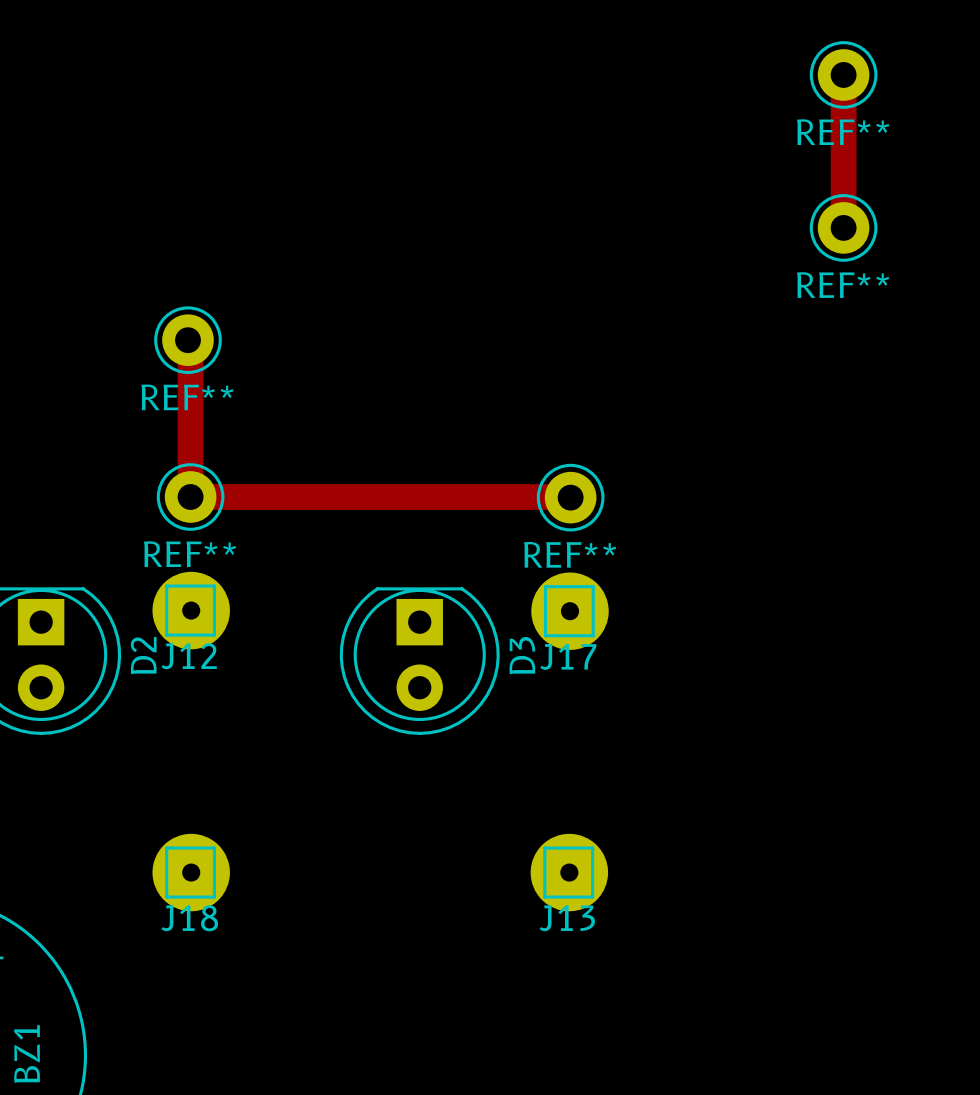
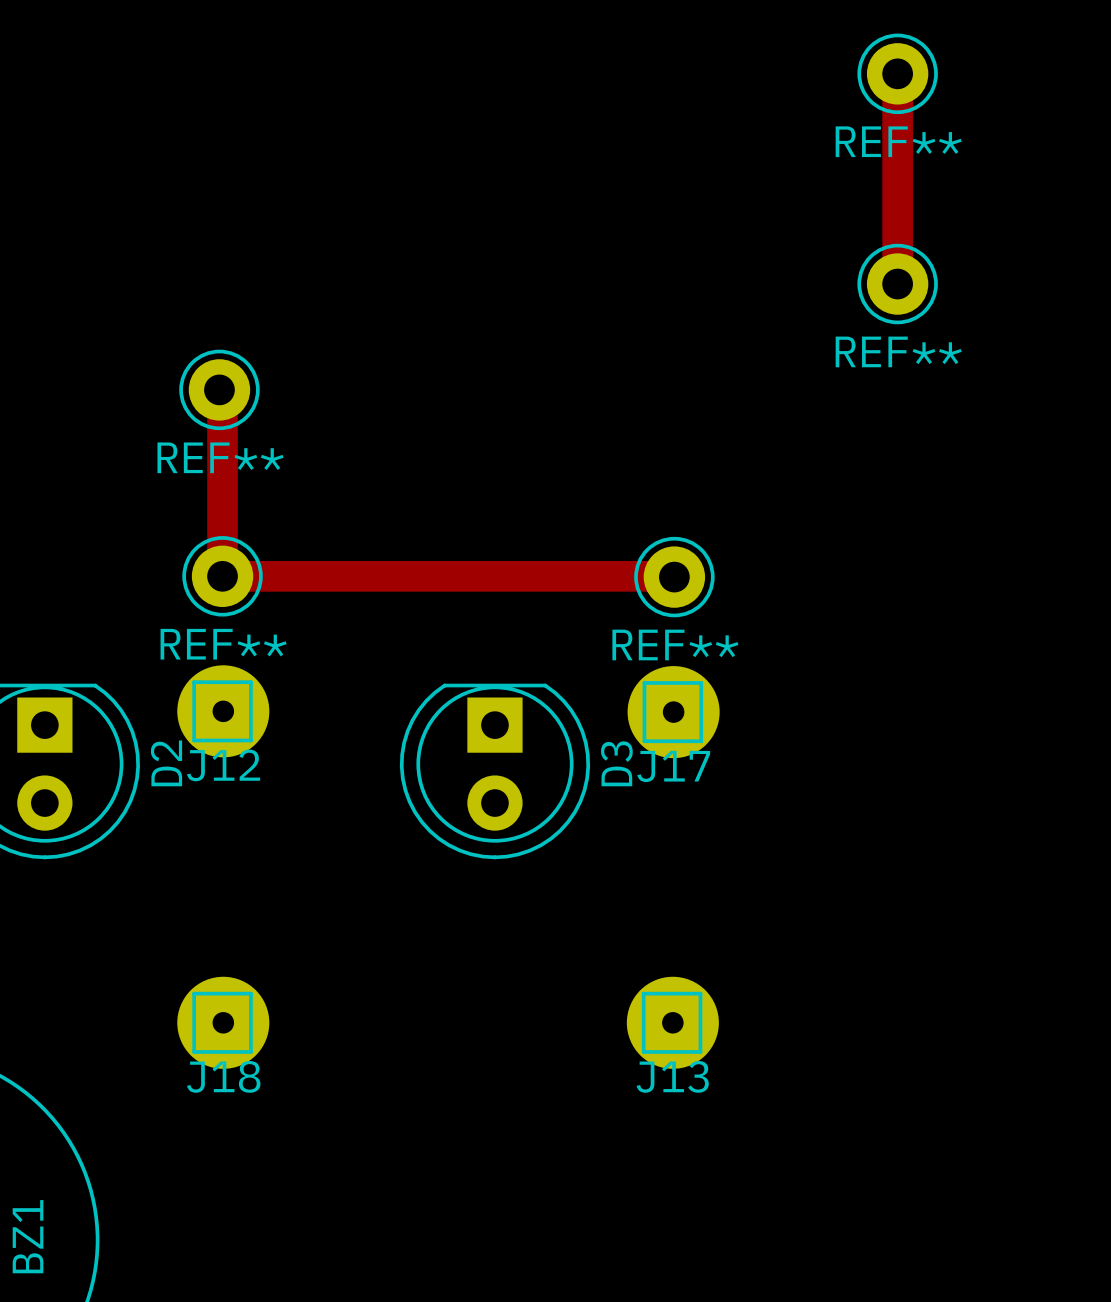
track: none -> (897, 73) (897, 284)
track: (843, 74) (843, 227) -> none
REF** position: (843, 74) -> (897, 73)
REF**: (843, 227) -> none
REF**: none -> (897, 284)

